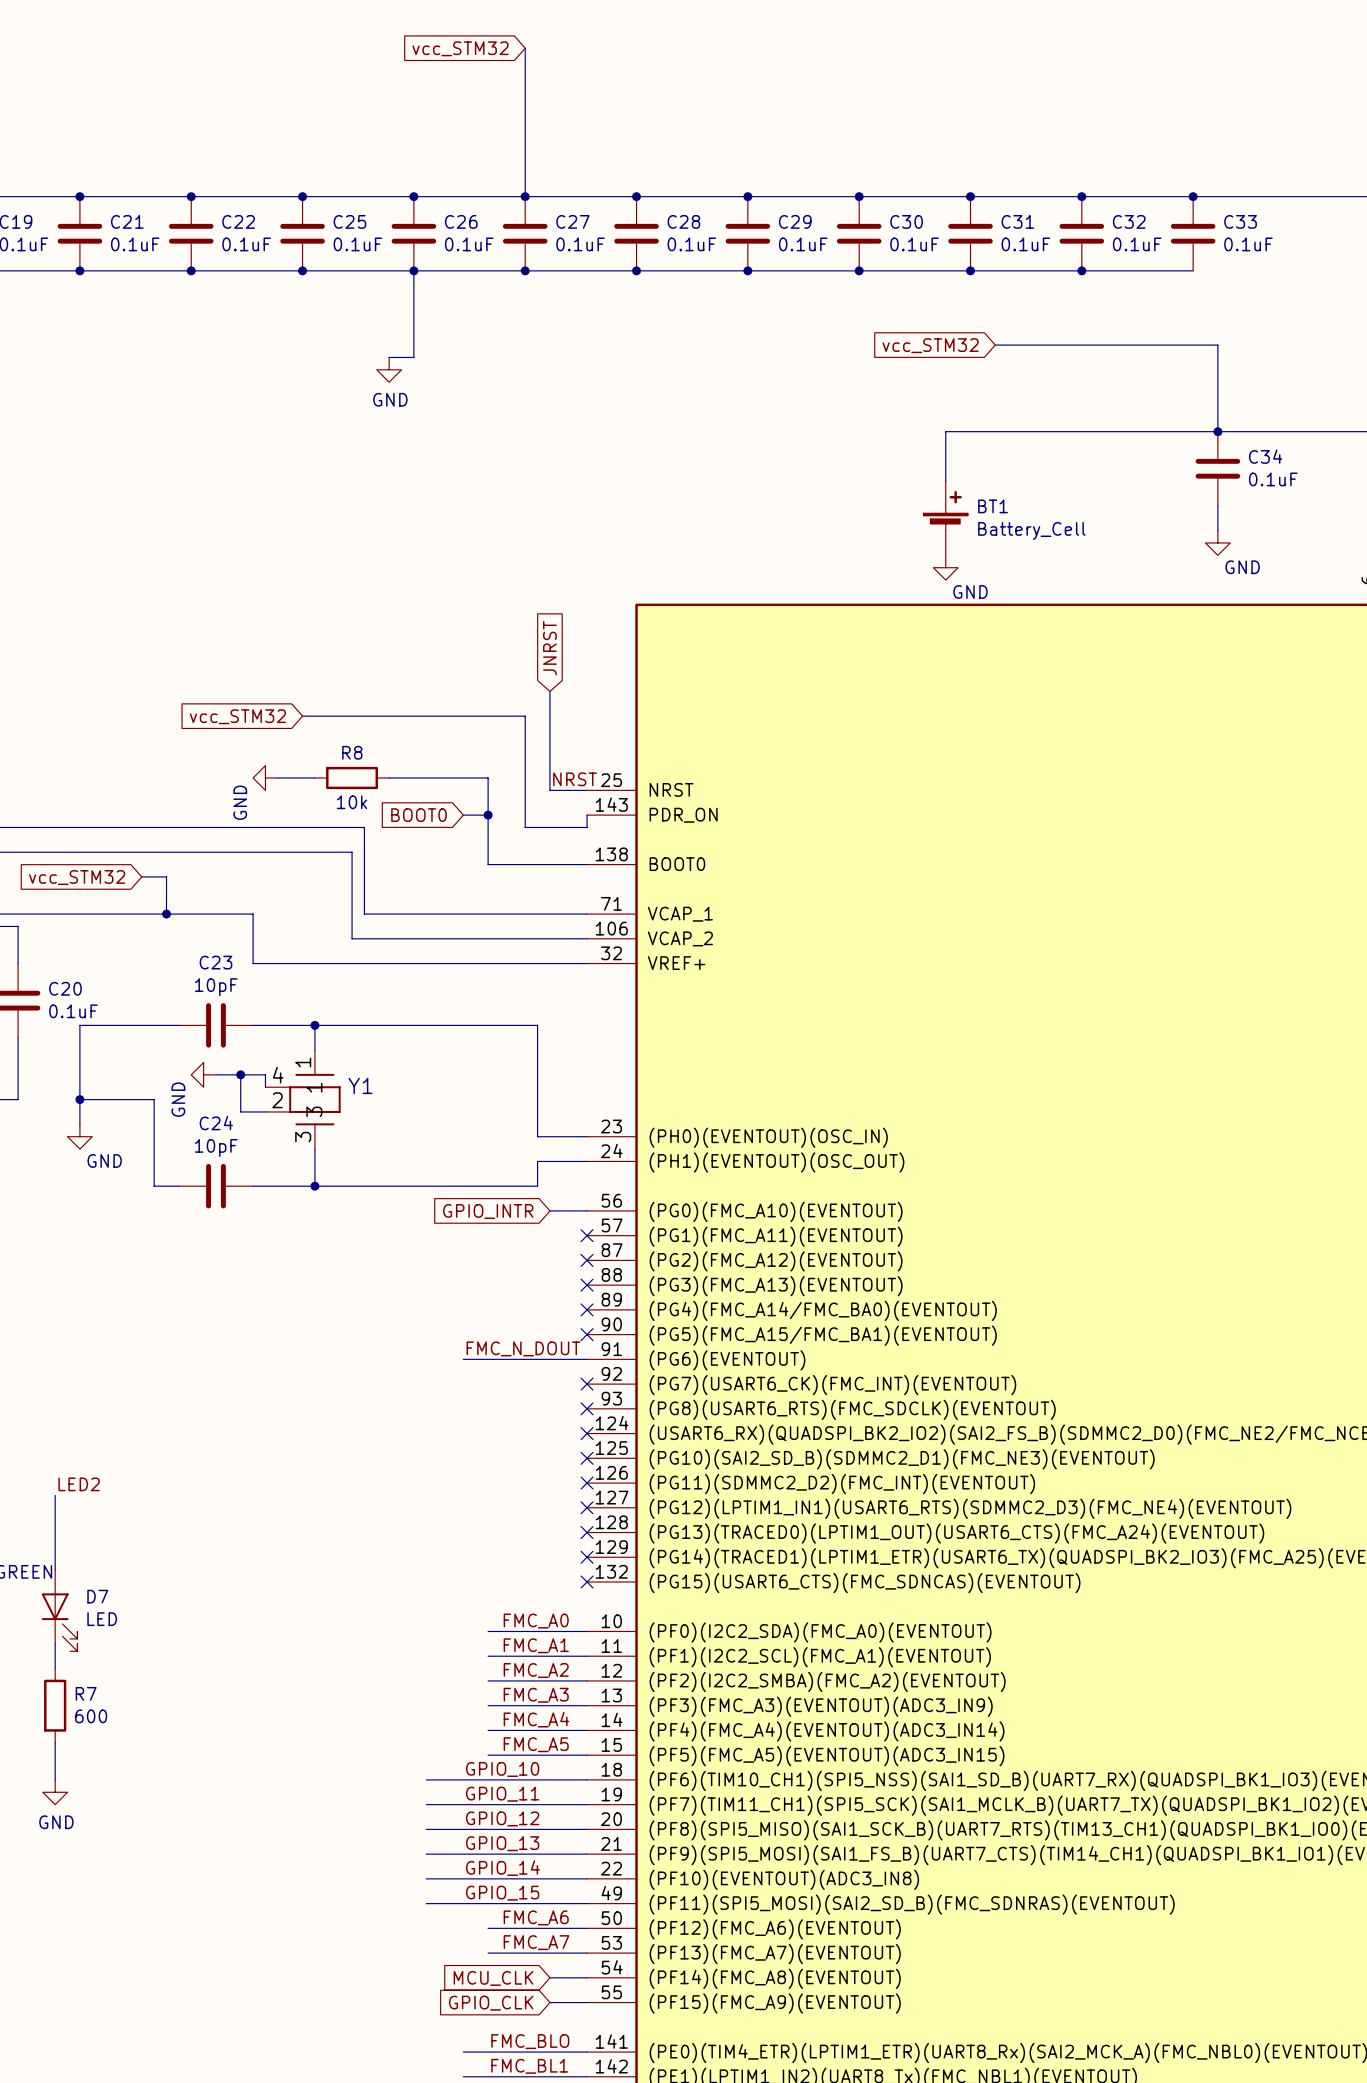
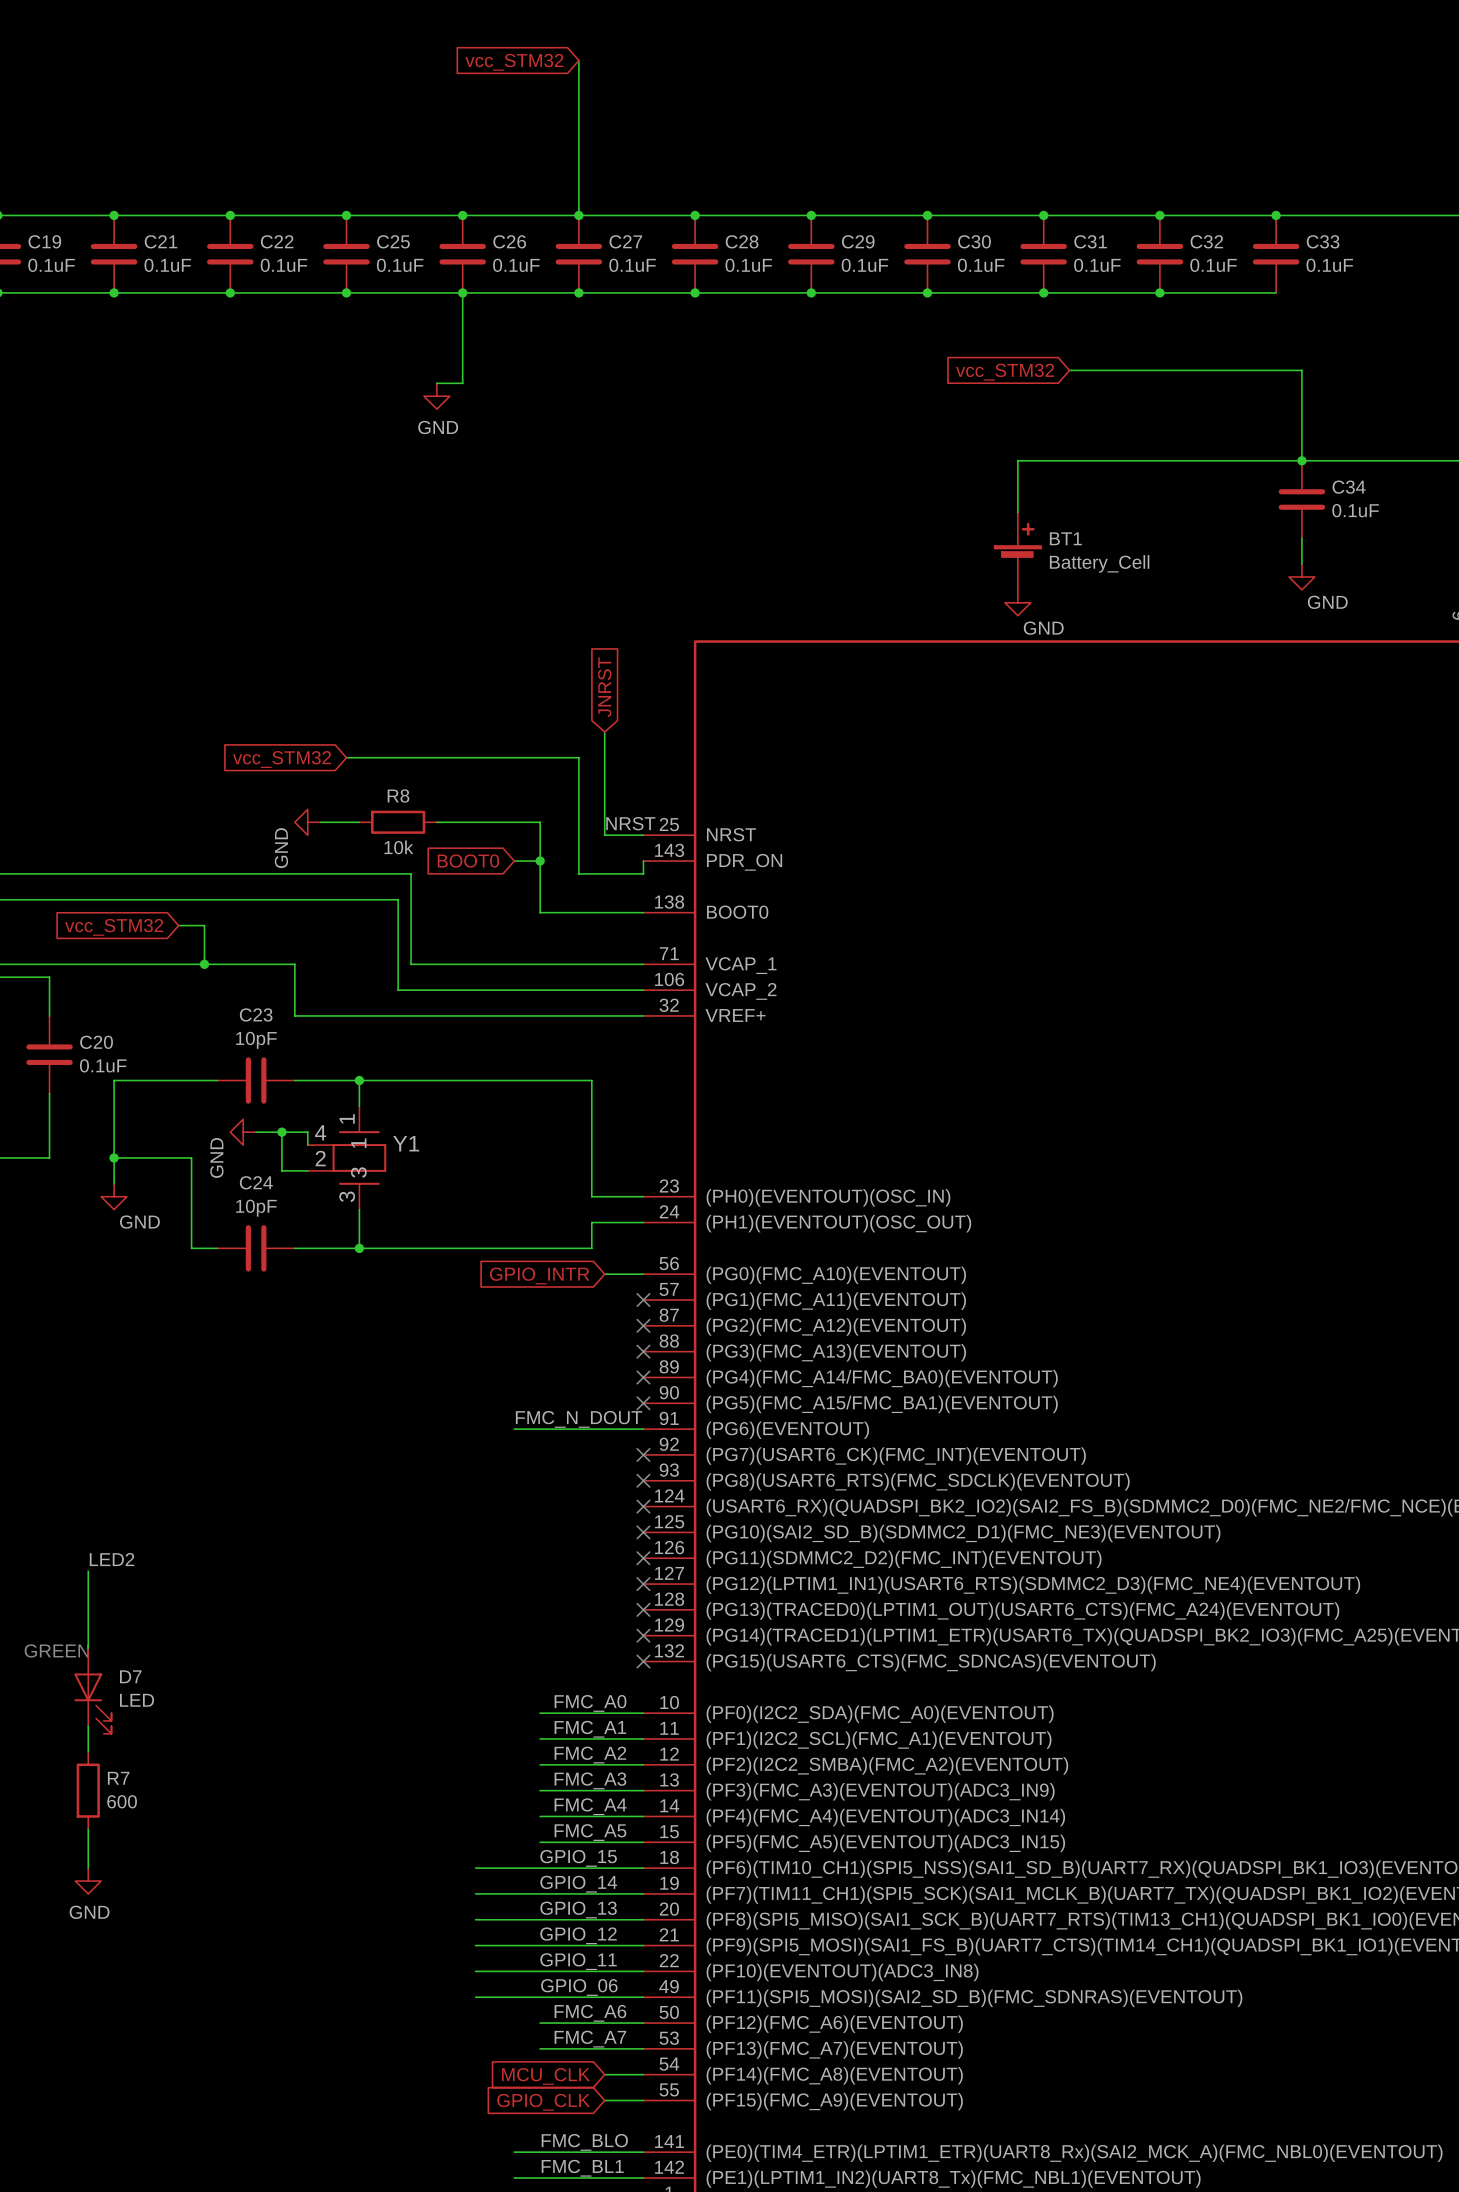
label: GPIO_10 (502, 1769) -> none
label position: GPIO_11 (502, 1794) -> GPIO_11 (578, 1961)
label position: GPIO_12 (502, 1818) -> GPIO_12 (578, 1935)
label position: GPIO_13 (502, 1843) -> GPIO_13 (578, 1910)
label position: GPIO_14 (502, 1868) -> GPIO_14 (578, 1884)
label position: GPIO_15 (502, 1893) -> GPIO_15 (578, 1858)
label: none -> GPIO_06 (579, 1987)

